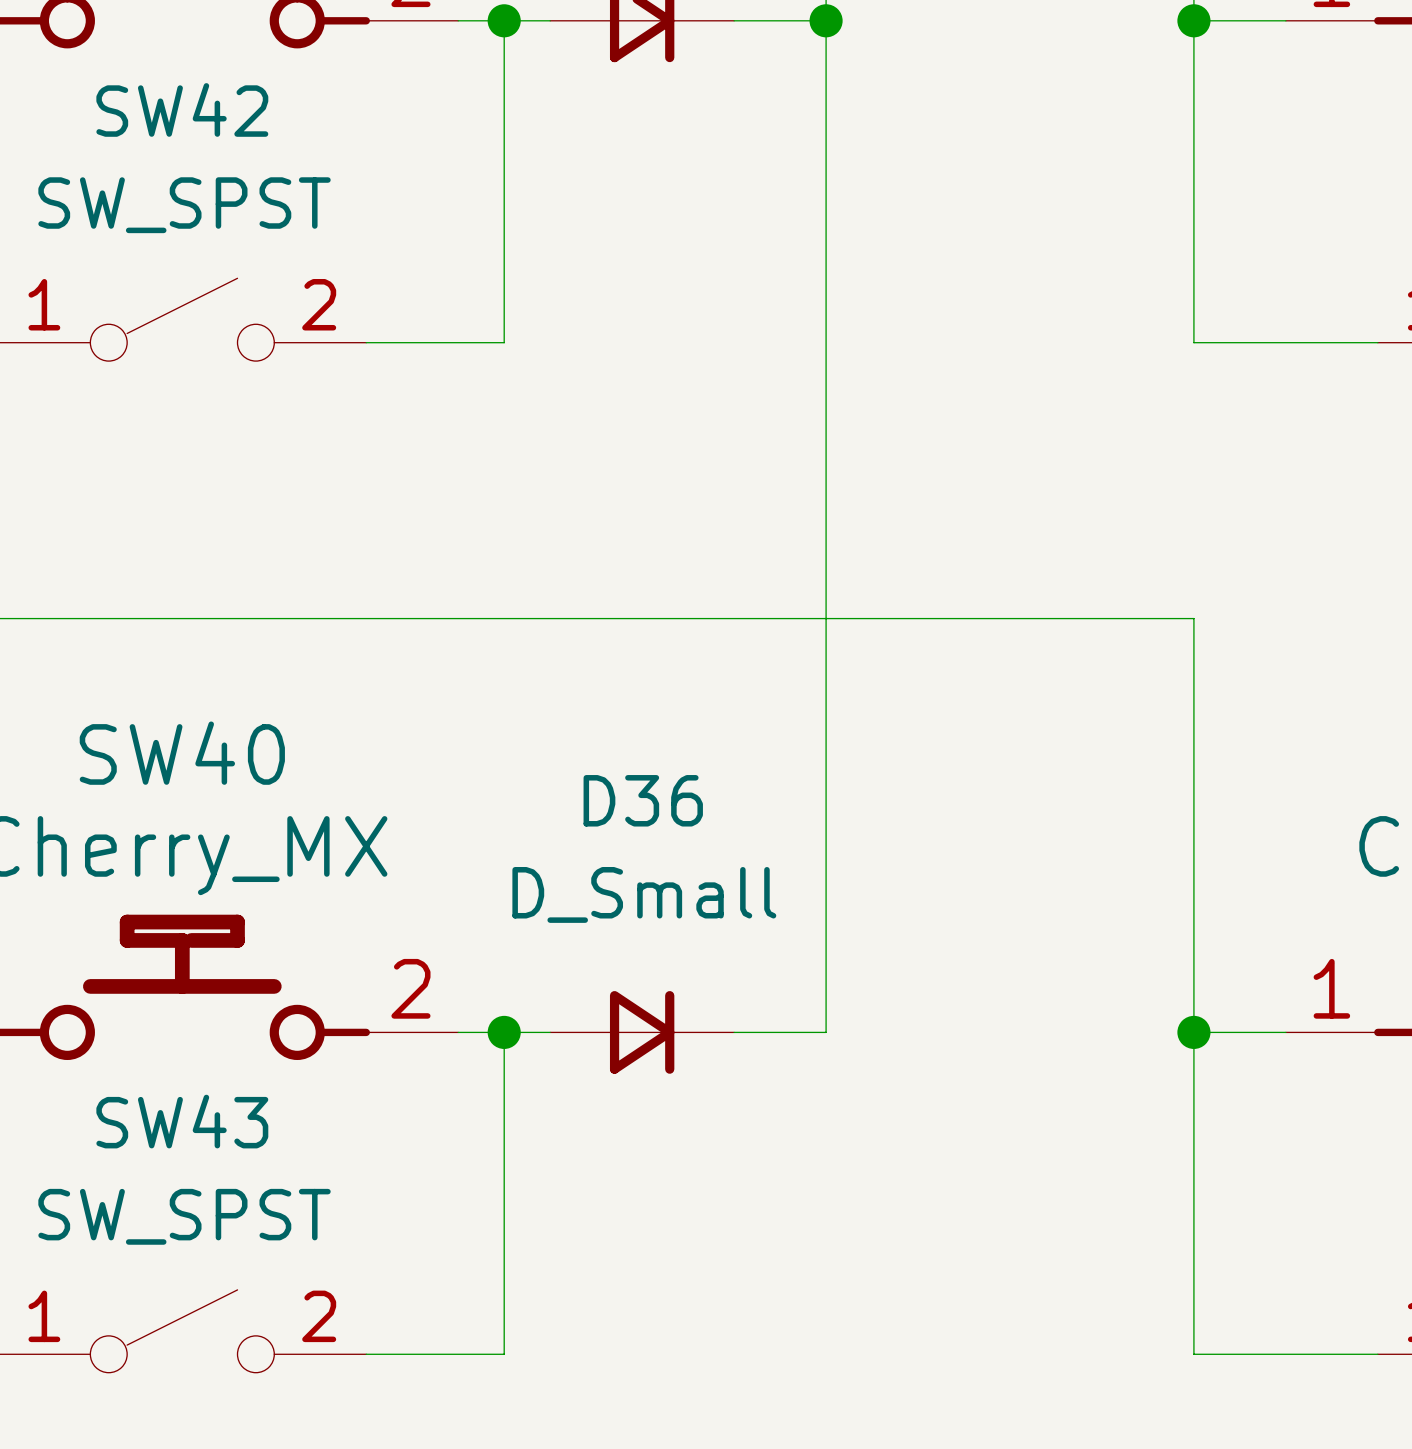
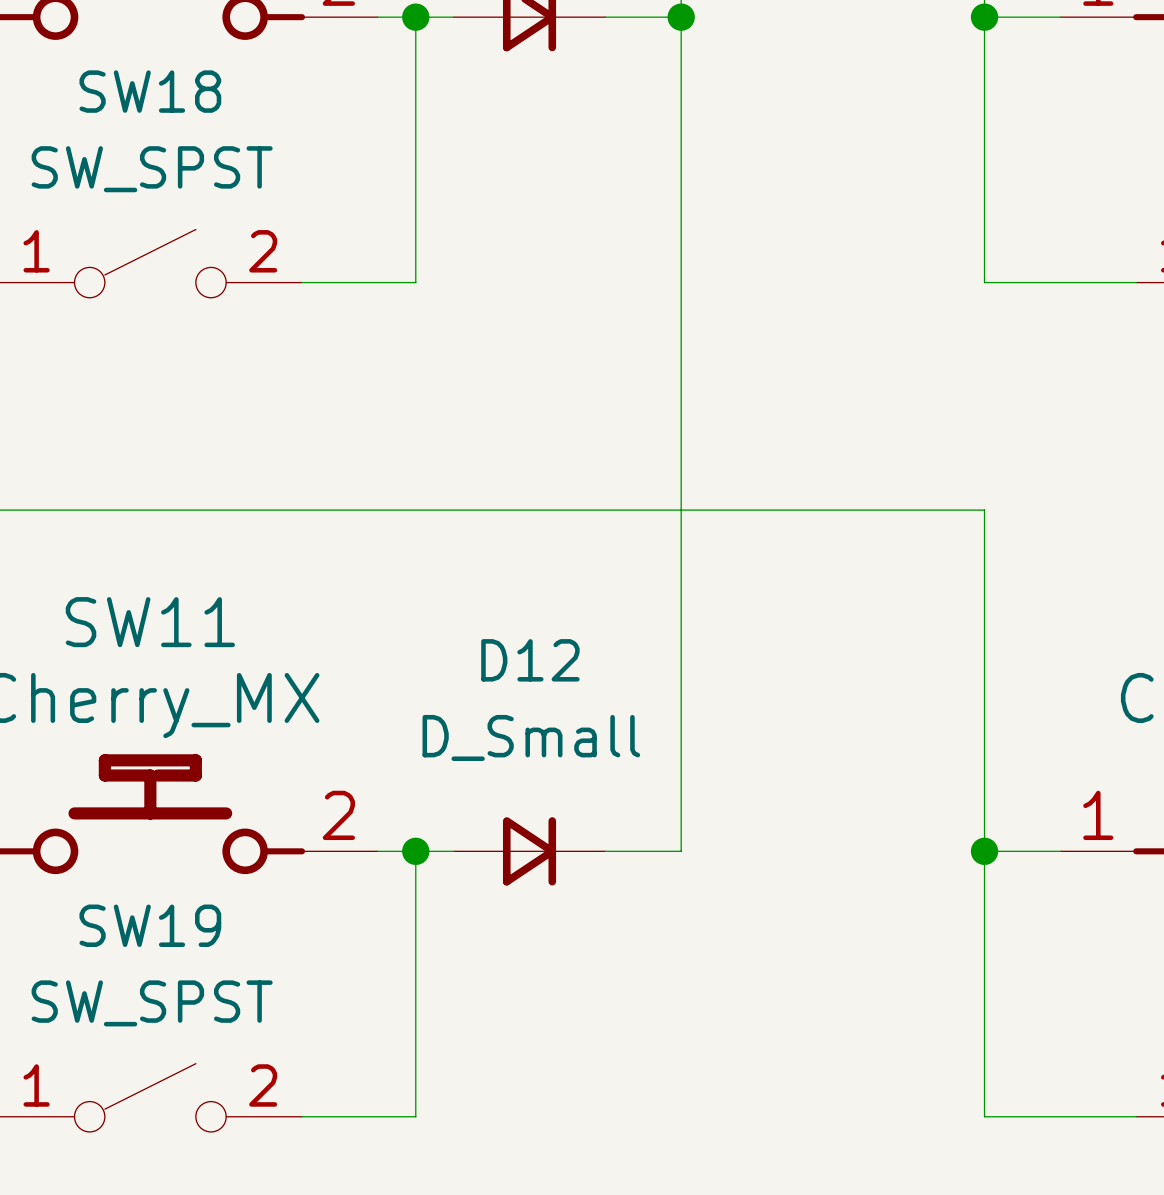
SW42 name: SW42 (182, 109) -> SW18 (150, 91)
SW40 name: SW40 (182, 753) -> SW11 (150, 622)
D36 name: D36 (643, 800) -> D12 (530, 660)
SW43 name: SW43 (182, 1121) -> SW19 (150, 925)

